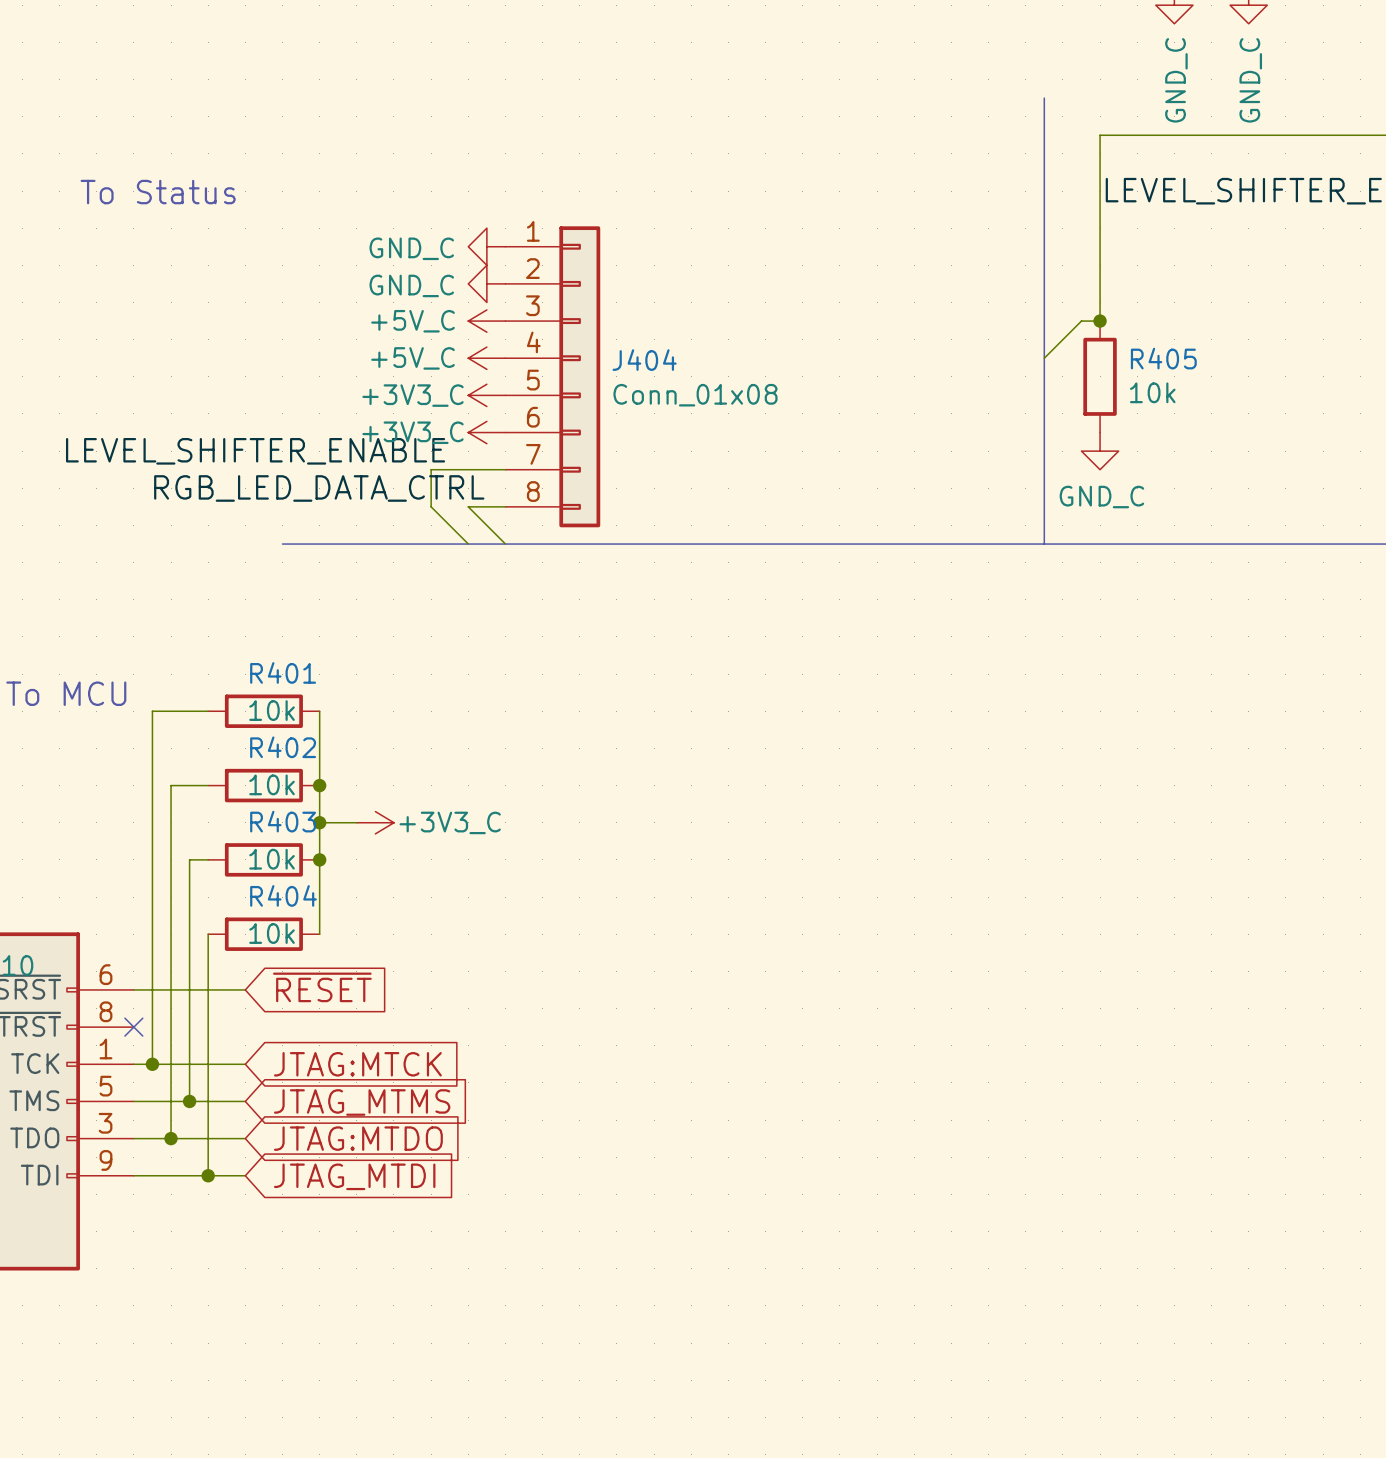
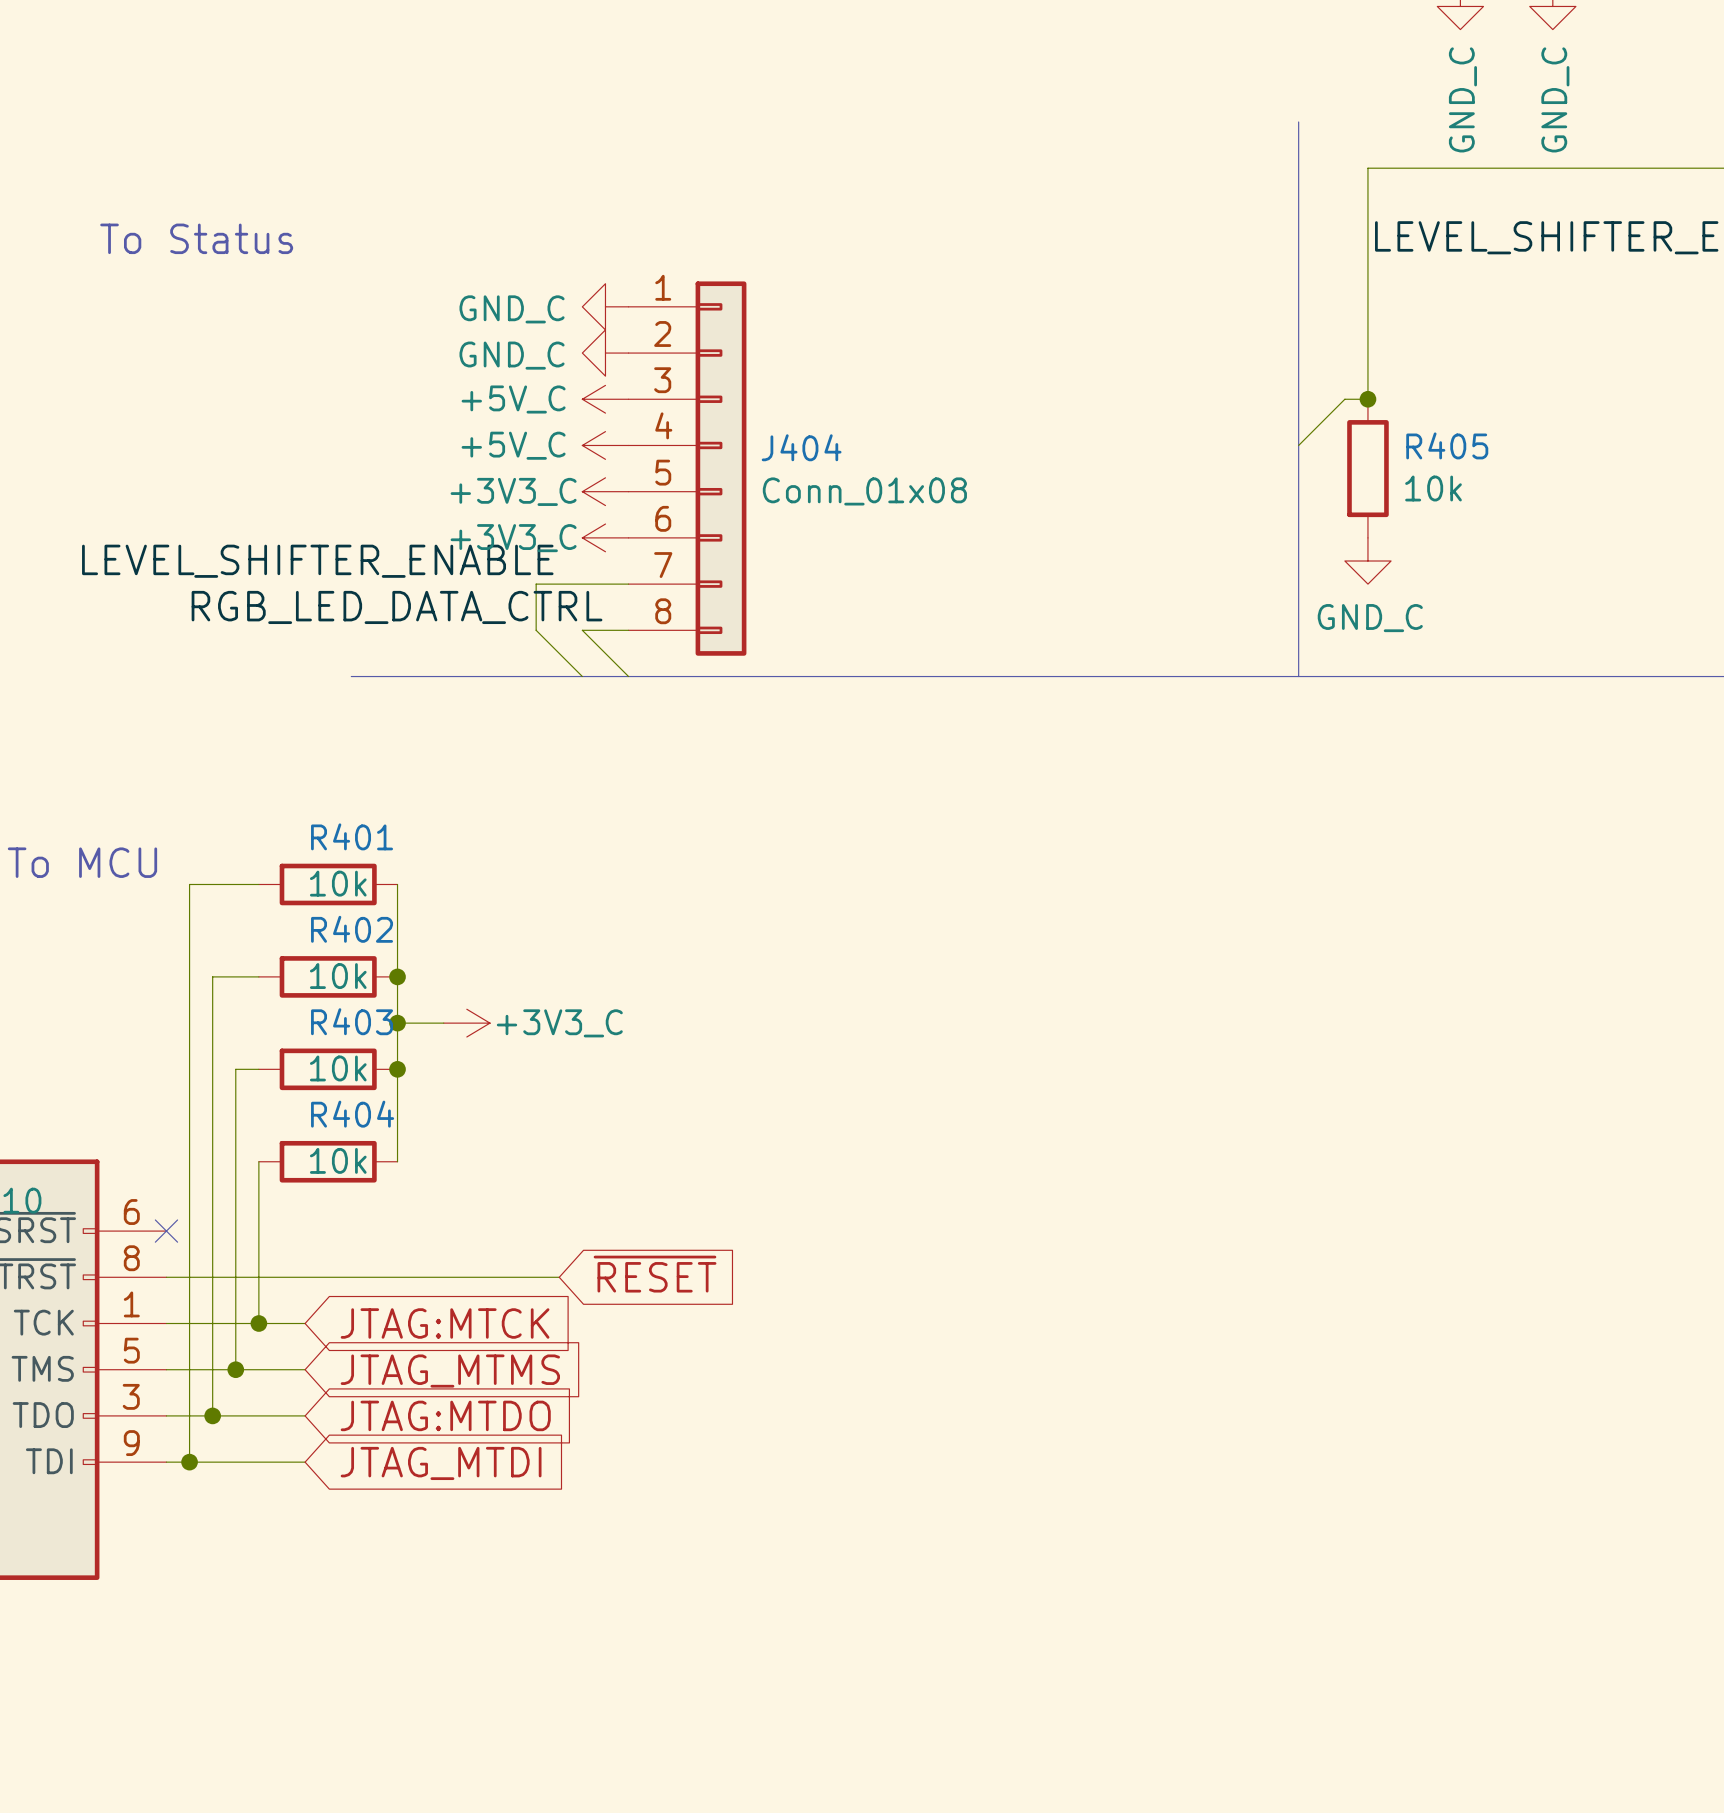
global label position: ~{RESET} (322, 987) -> ~{RESET} (655, 1274)
wire: (133, 989) (245, 989) -> none
wire: none -> (166, 1277) (559, 1277)
no-connect mark position: (133, 1027) -> (166, 1231)
junction: (152, 1064) -> none
wire: (208, 1064) (208, 1175) -> (189, 1323) (189, 1462)
junction: none -> (258, 1323)
junction: none -> (189, 1462)
junction: (208, 1175) -> none

